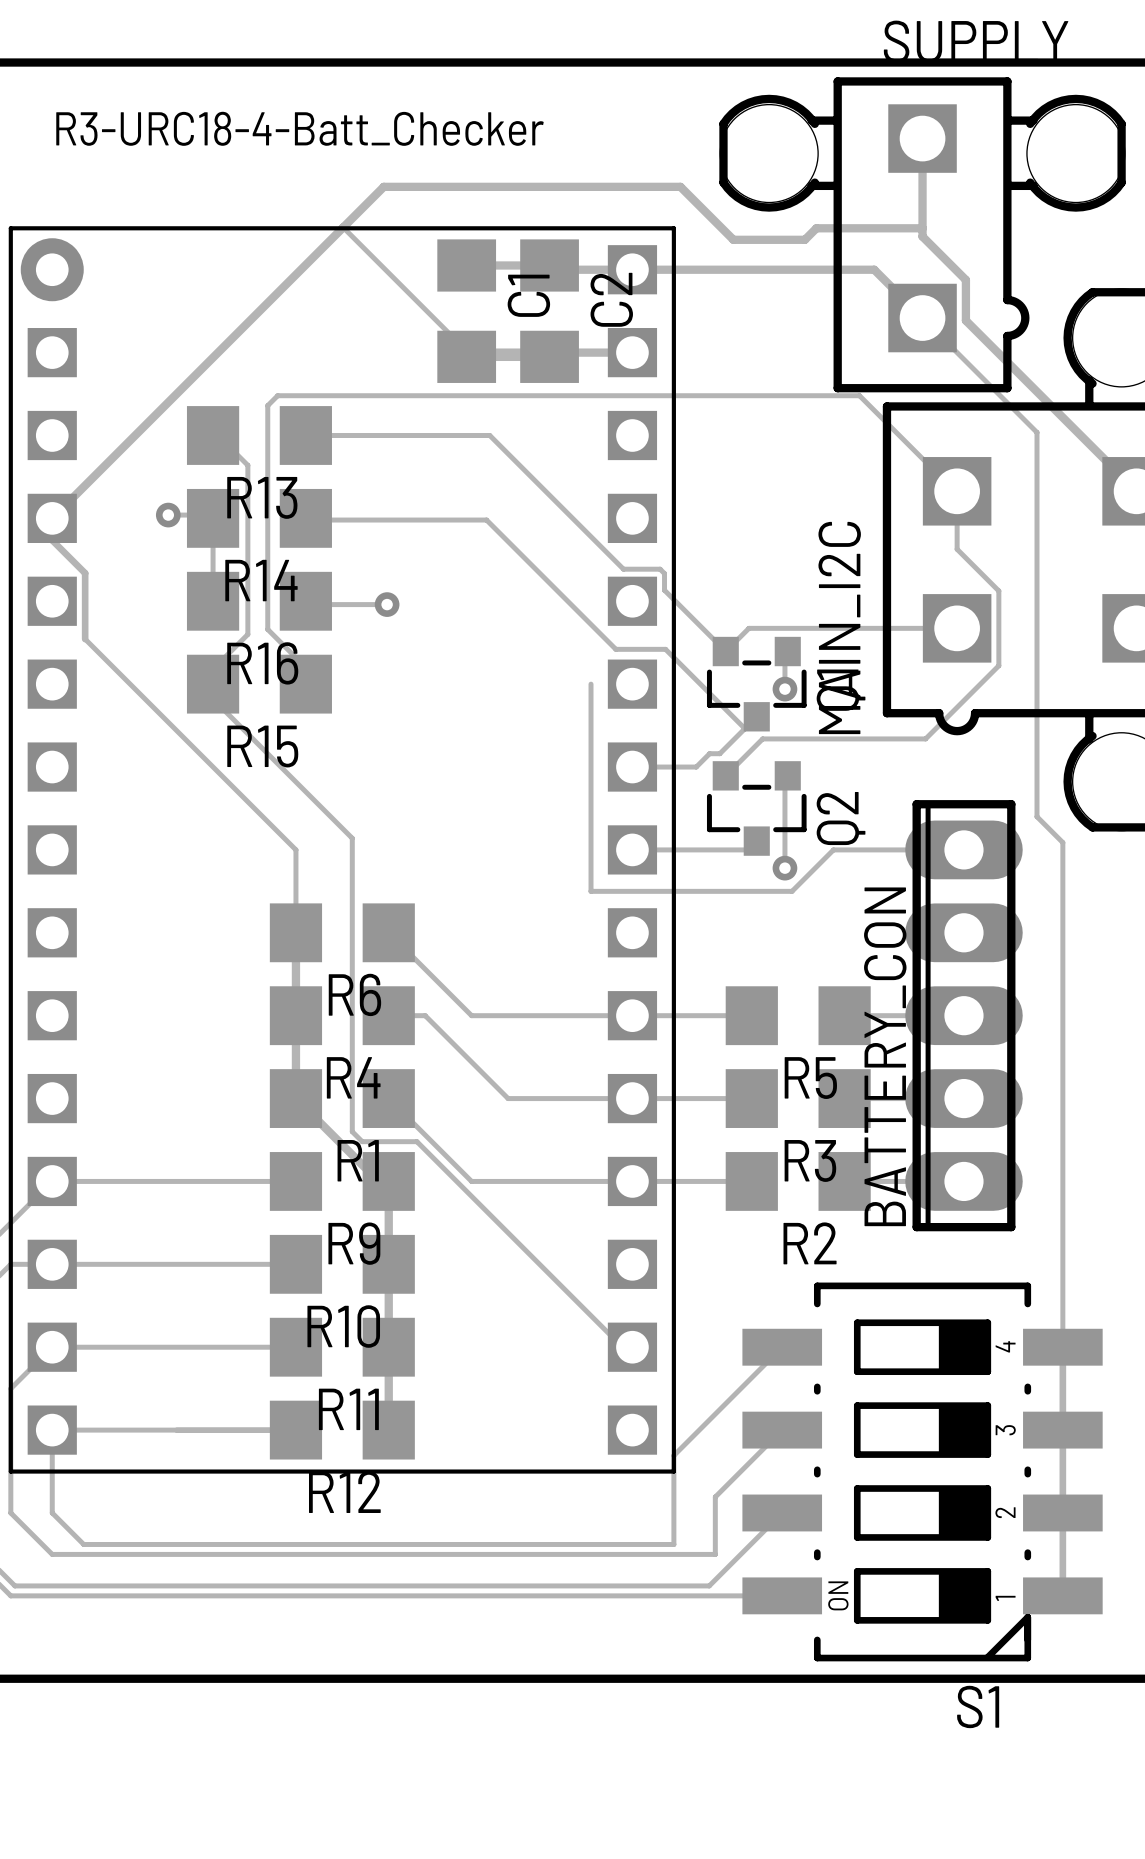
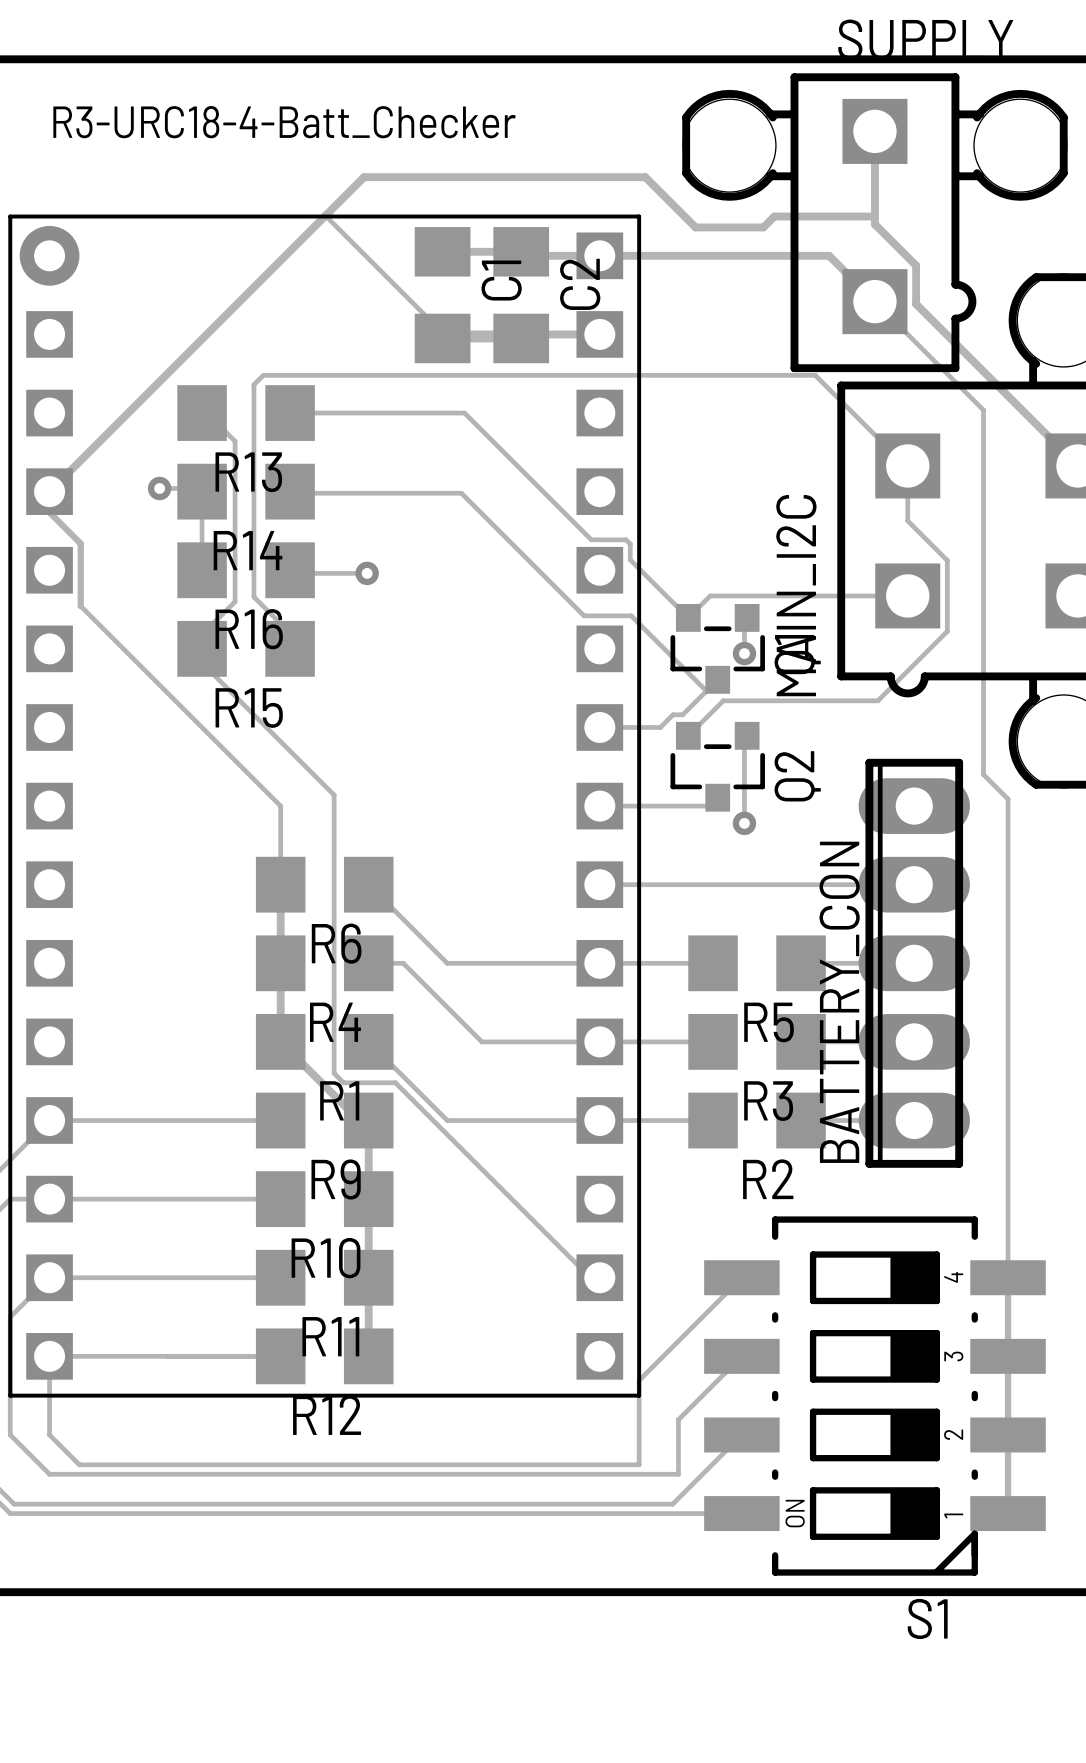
track: (591, 684) (591, 891) (792, 891) (833, 849) (963, 849) -> none
track: none -> (599, 884) (914, 884)

